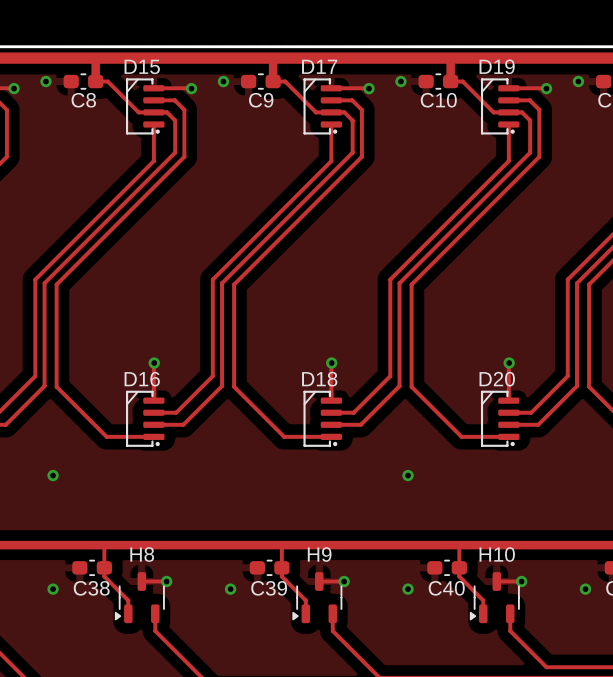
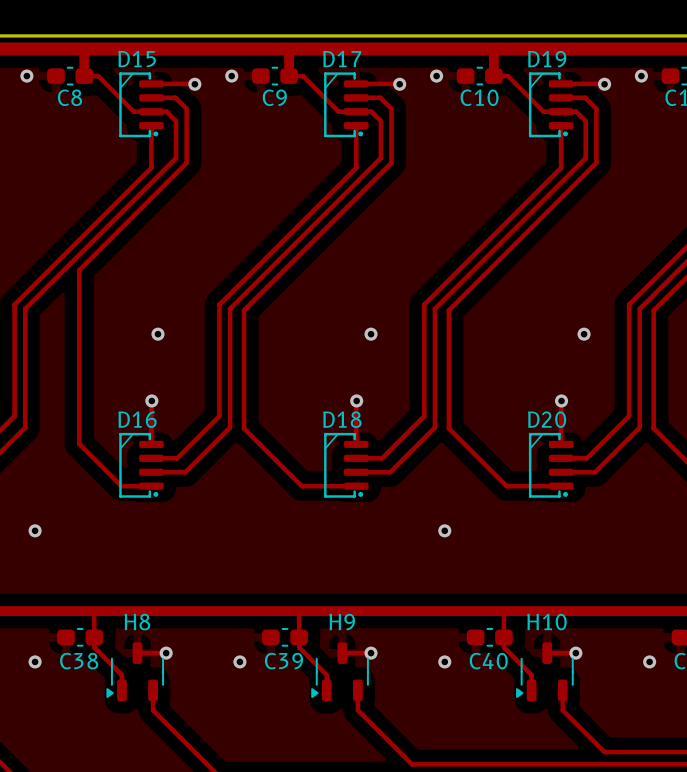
track: (91, 249) (56, 284) (56, 386) (106, 436) (127, 436) -> (79, 270) (79, 443) (121, 486)
via: none -> (157, 334)
via: none -> (371, 334)
via: none -> (584, 334)

